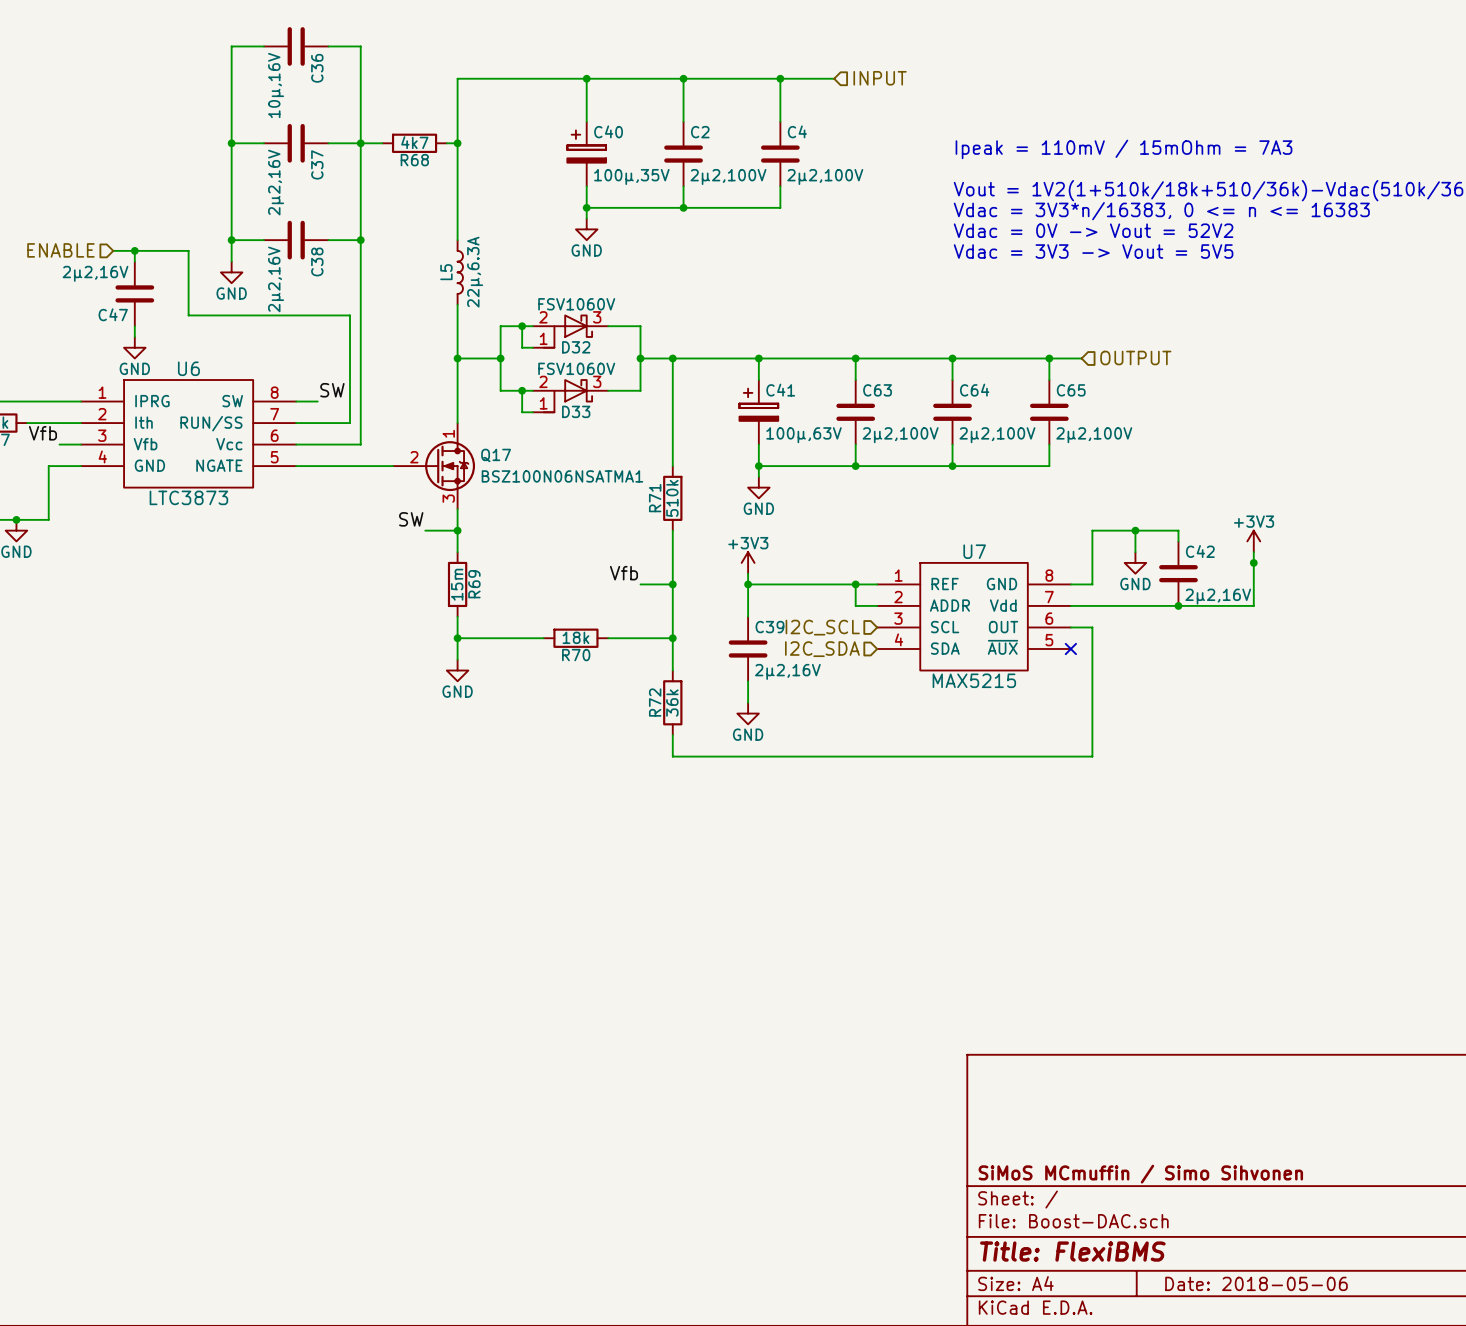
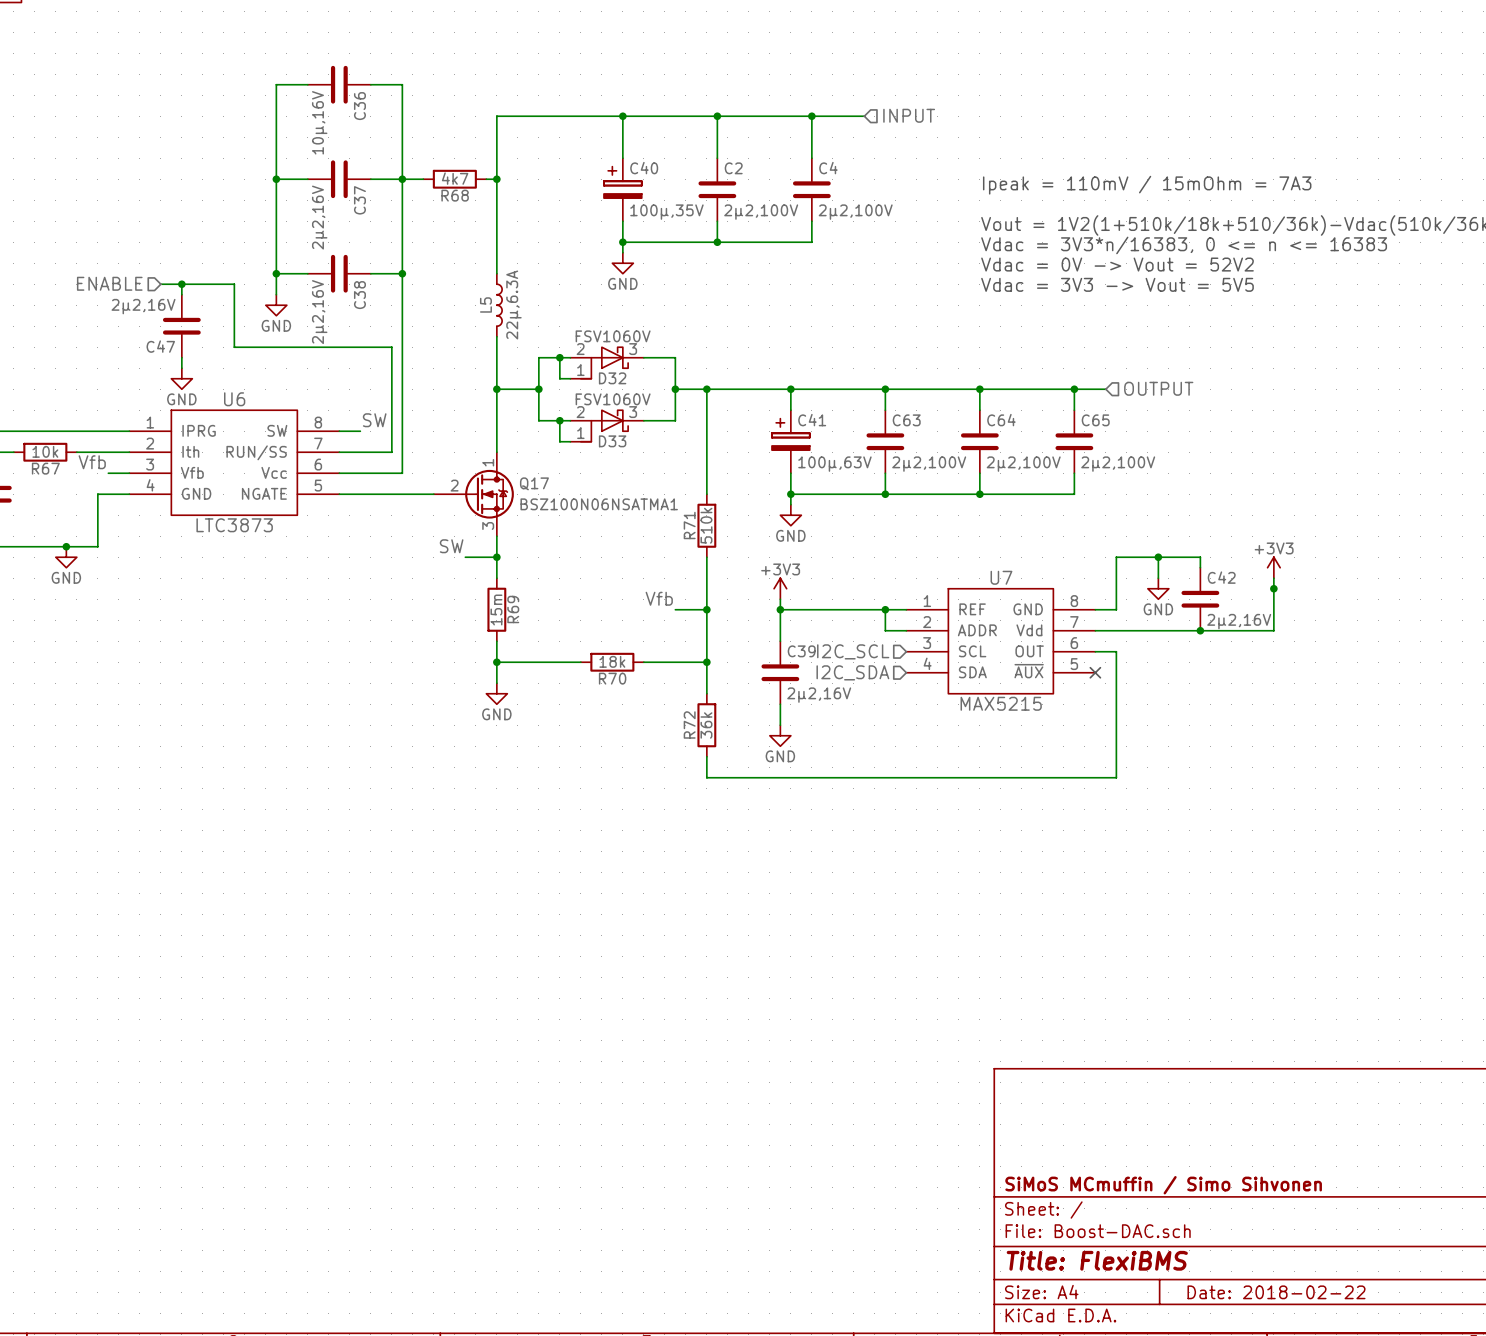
title block: Date: 2018-05-06 (1256, 1283) -> Date: 2018-02-22 (1276, 1292)

